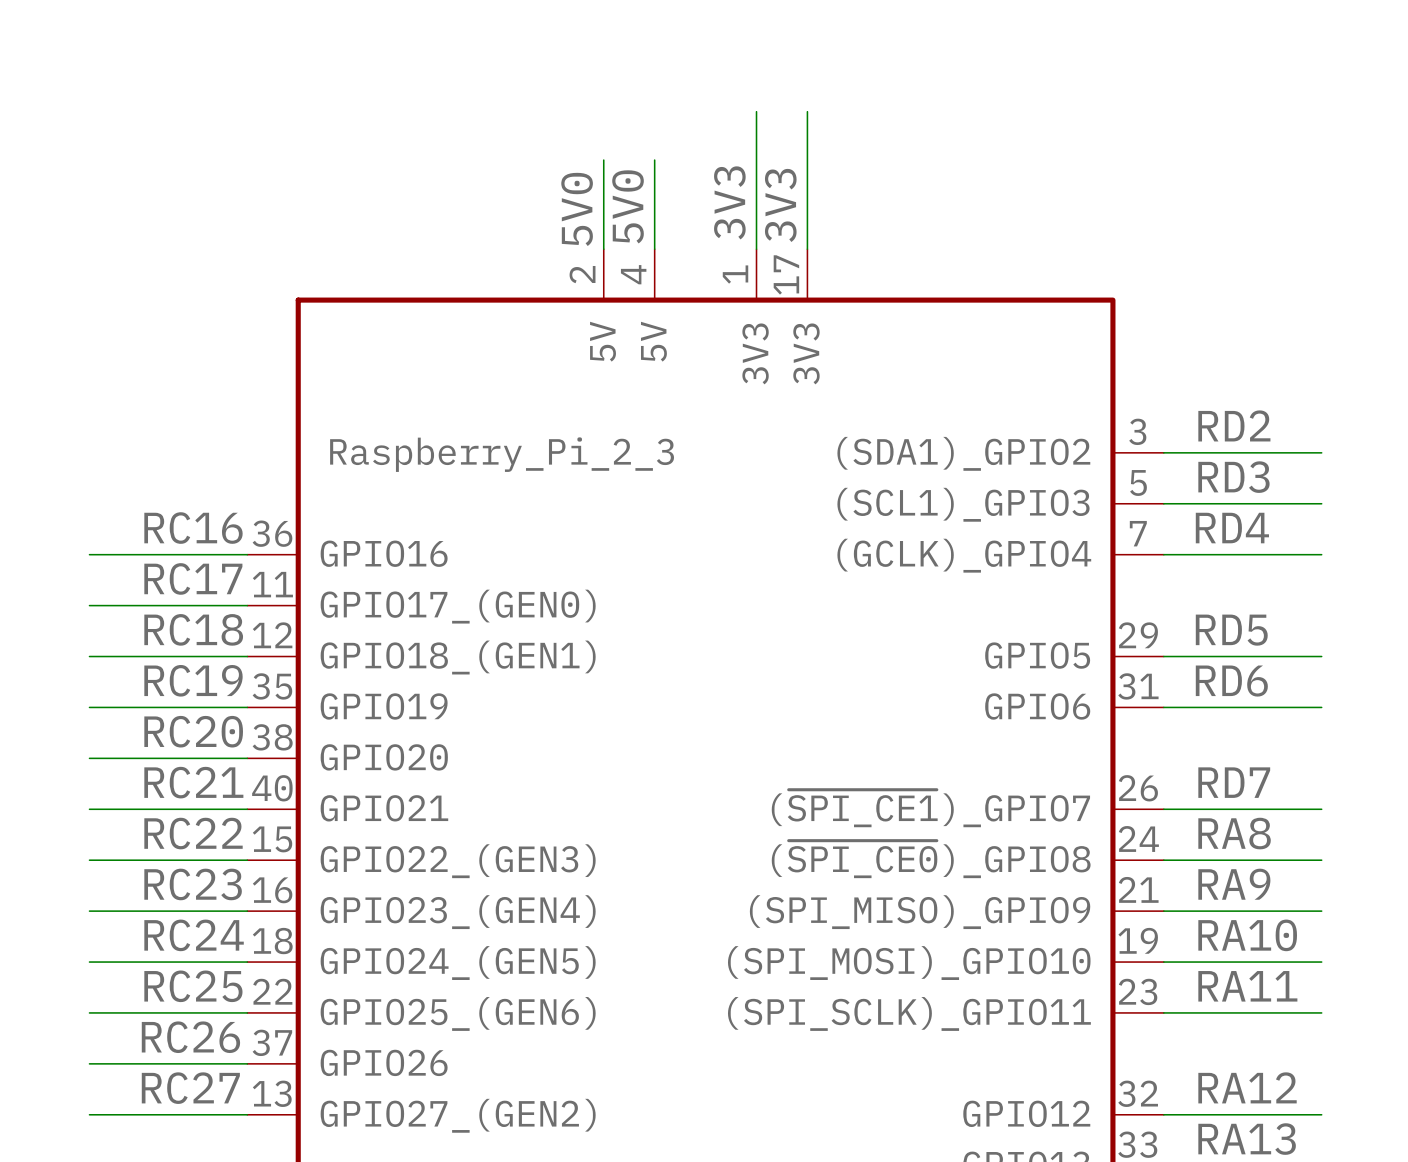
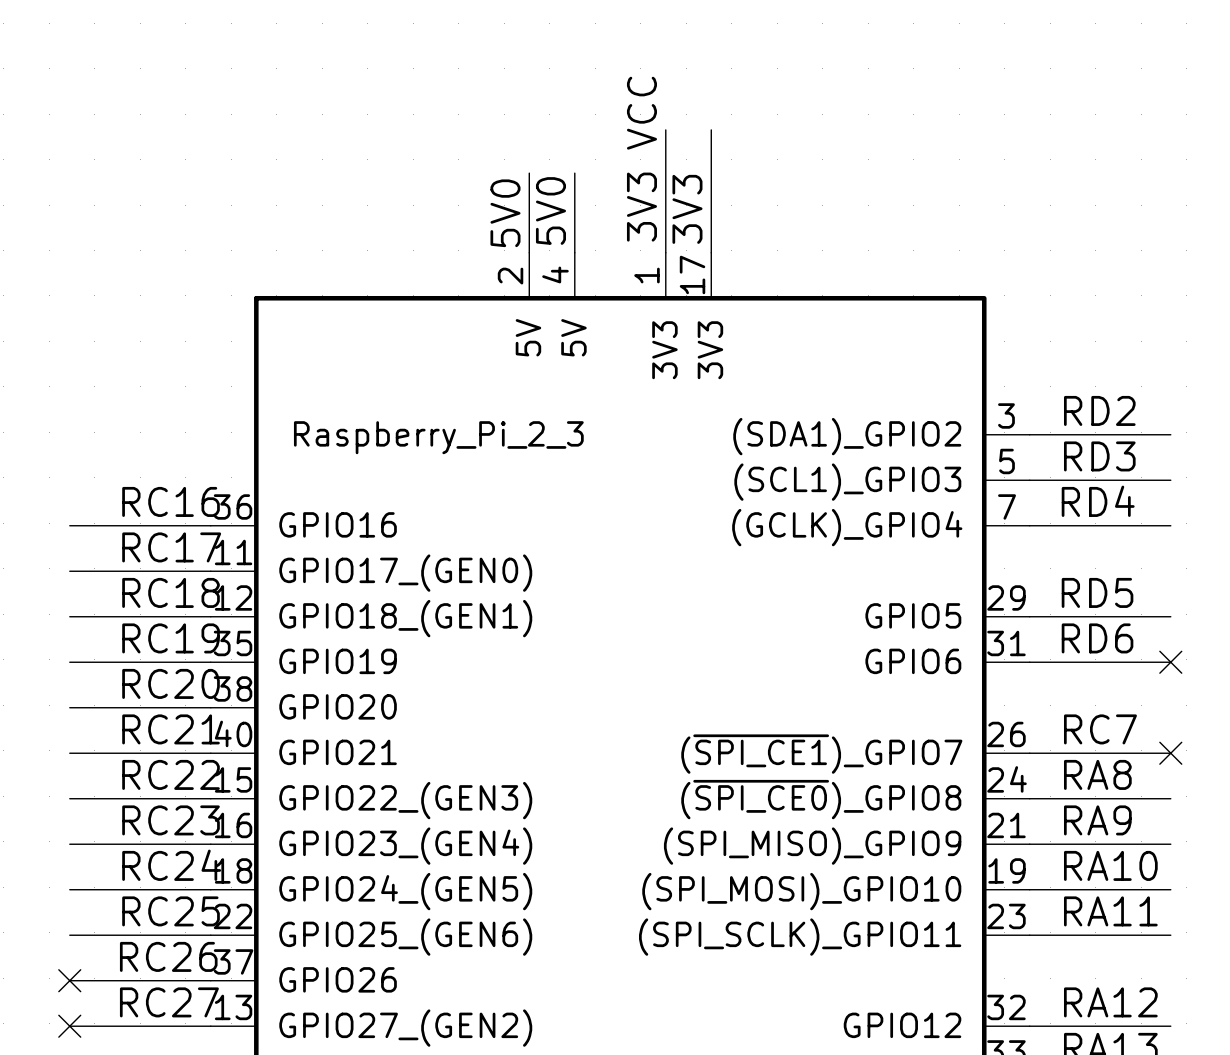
label: none -> VCC (641, 113)
no-connect mark: none -> (1170, 662)
label: RD7 (1234, 782) -> RC7 (1100, 729)
no-connect mark: none -> (1170, 753)
no-connect mark: none -> (69, 980)
no-connect mark: none -> (69, 1026)

